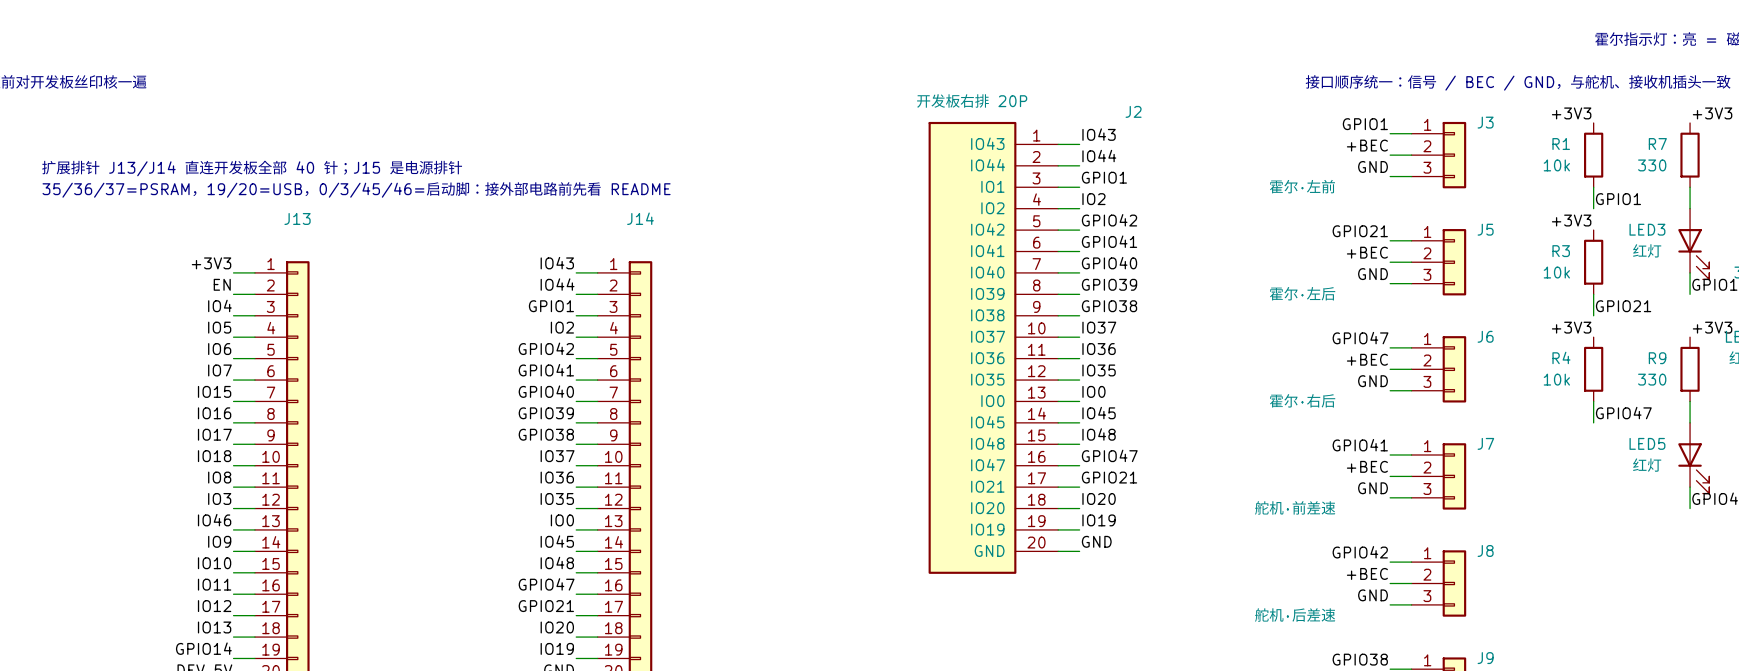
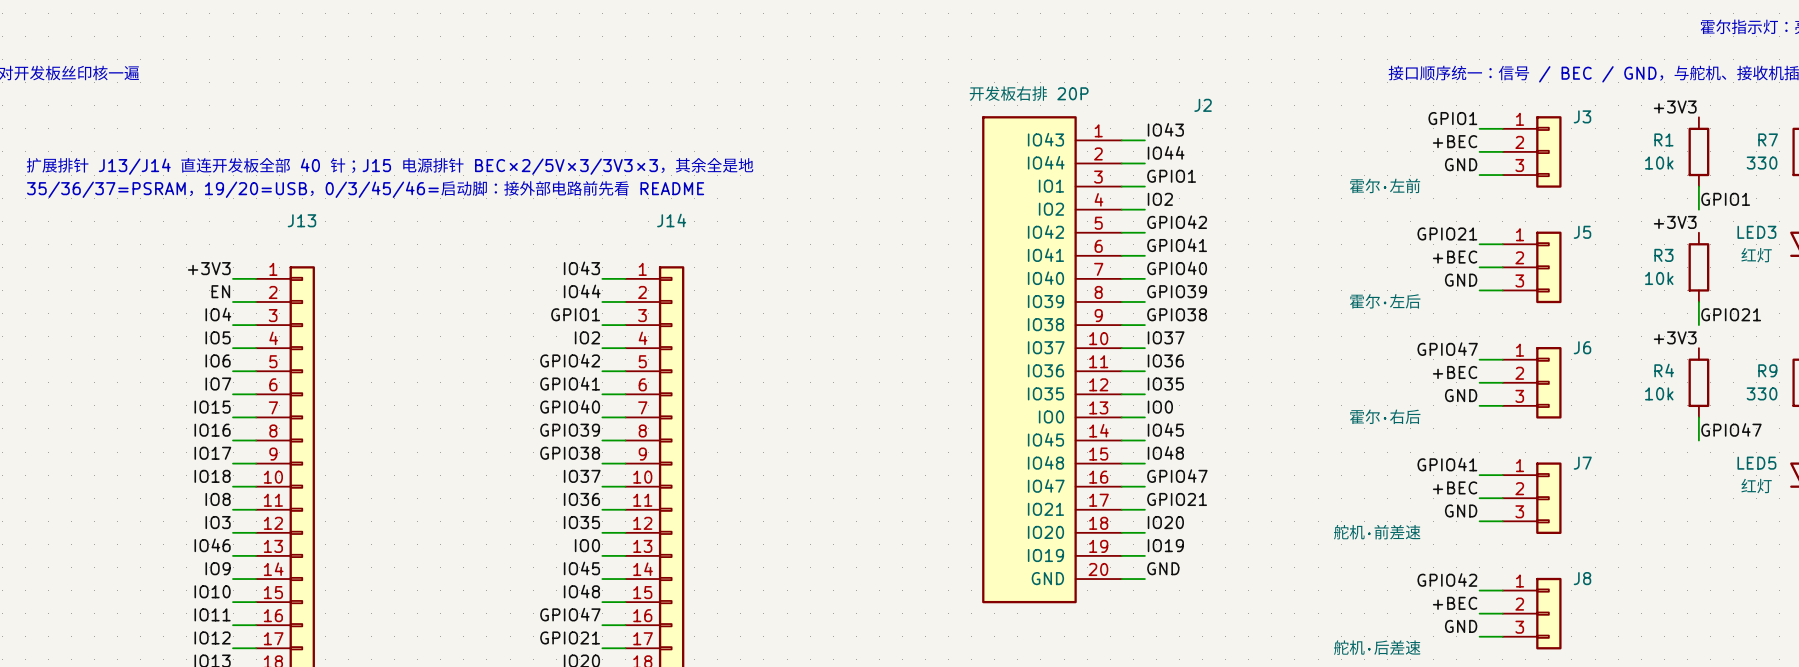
text: 扩展排针 J13/J14 直连开发板全部 40 针；J15 是电源排针 (252, 168) -> 扩展排针 J13/J14 直连开发板全部 40 针；J15 电源排针 BEC×2/5V×3/3V3×3，其余全是地 (390, 166)

